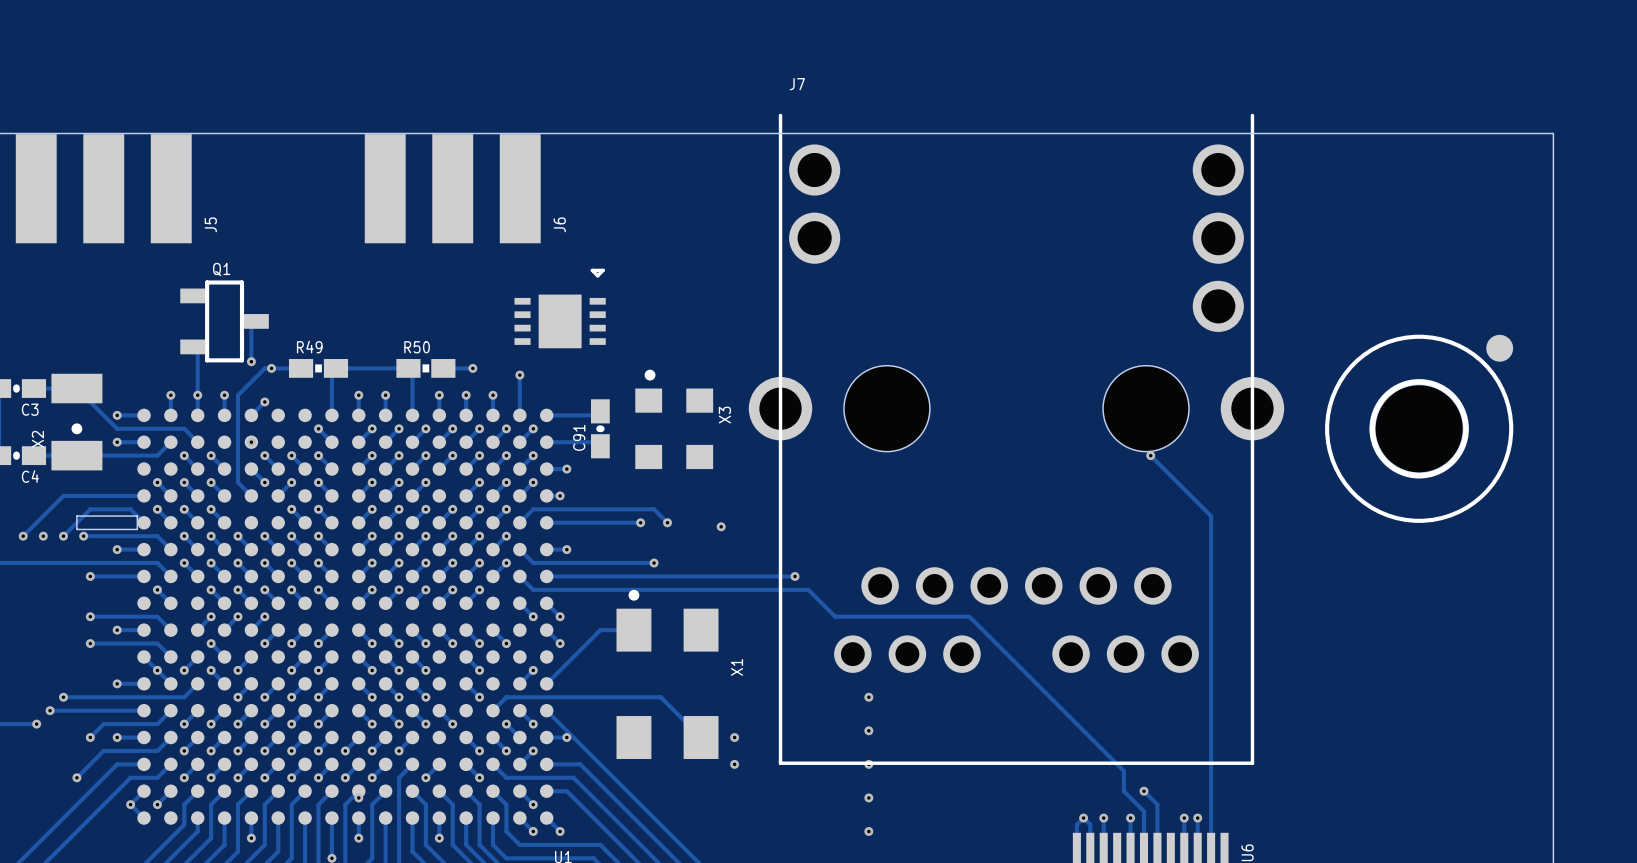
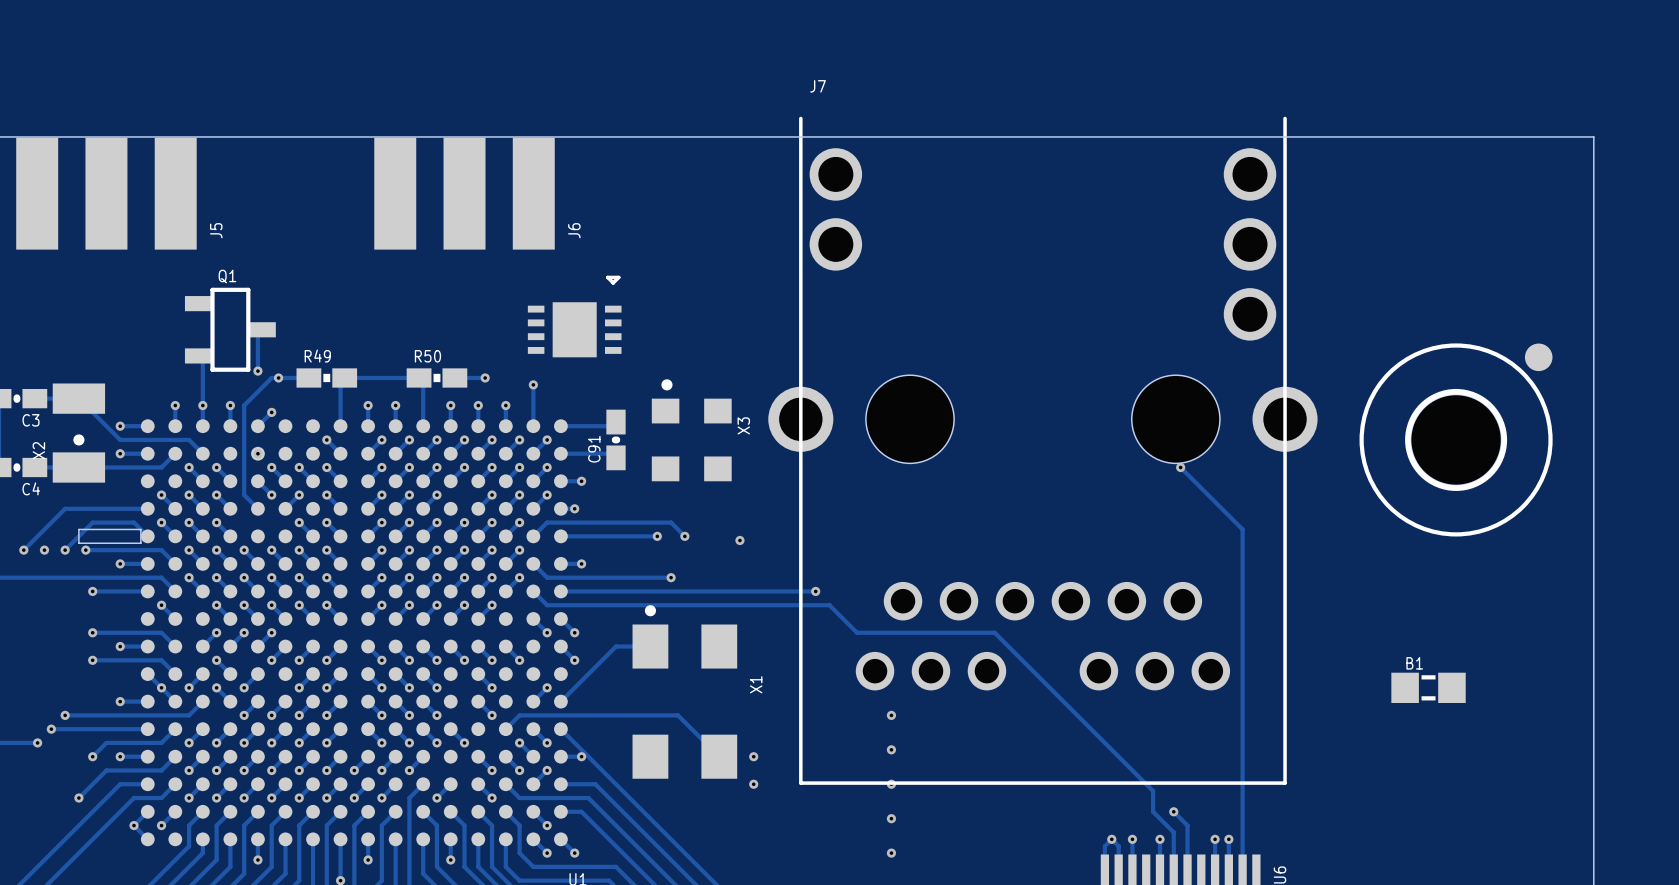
B1: none -> (1428, 687)
via: (358, 797) -> none

